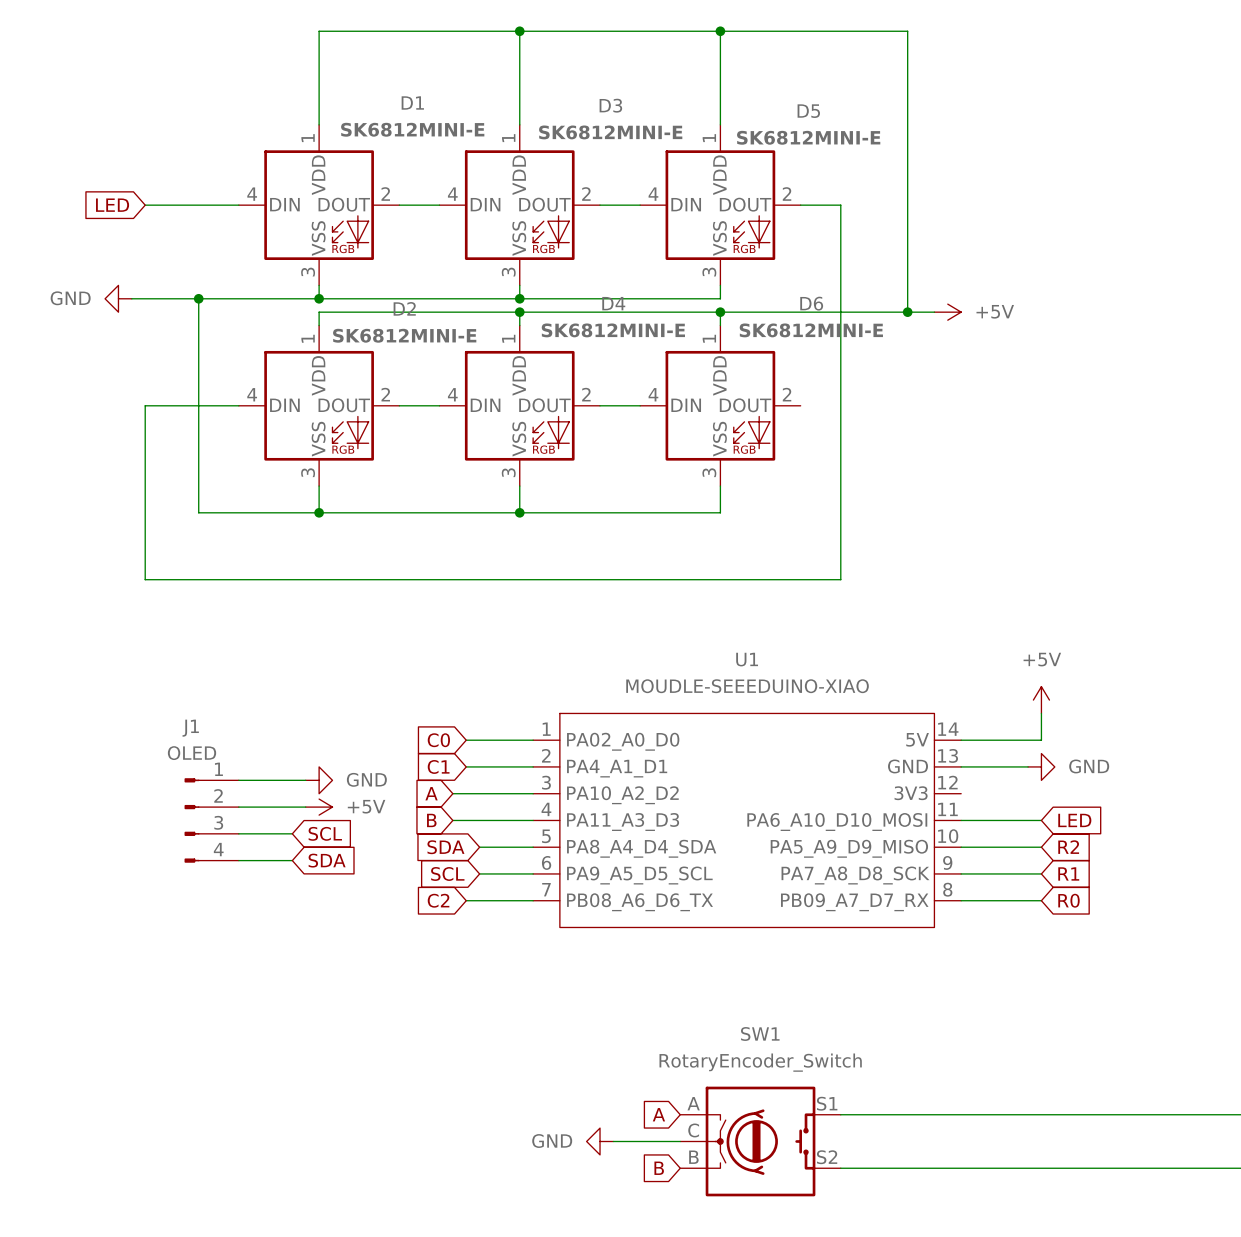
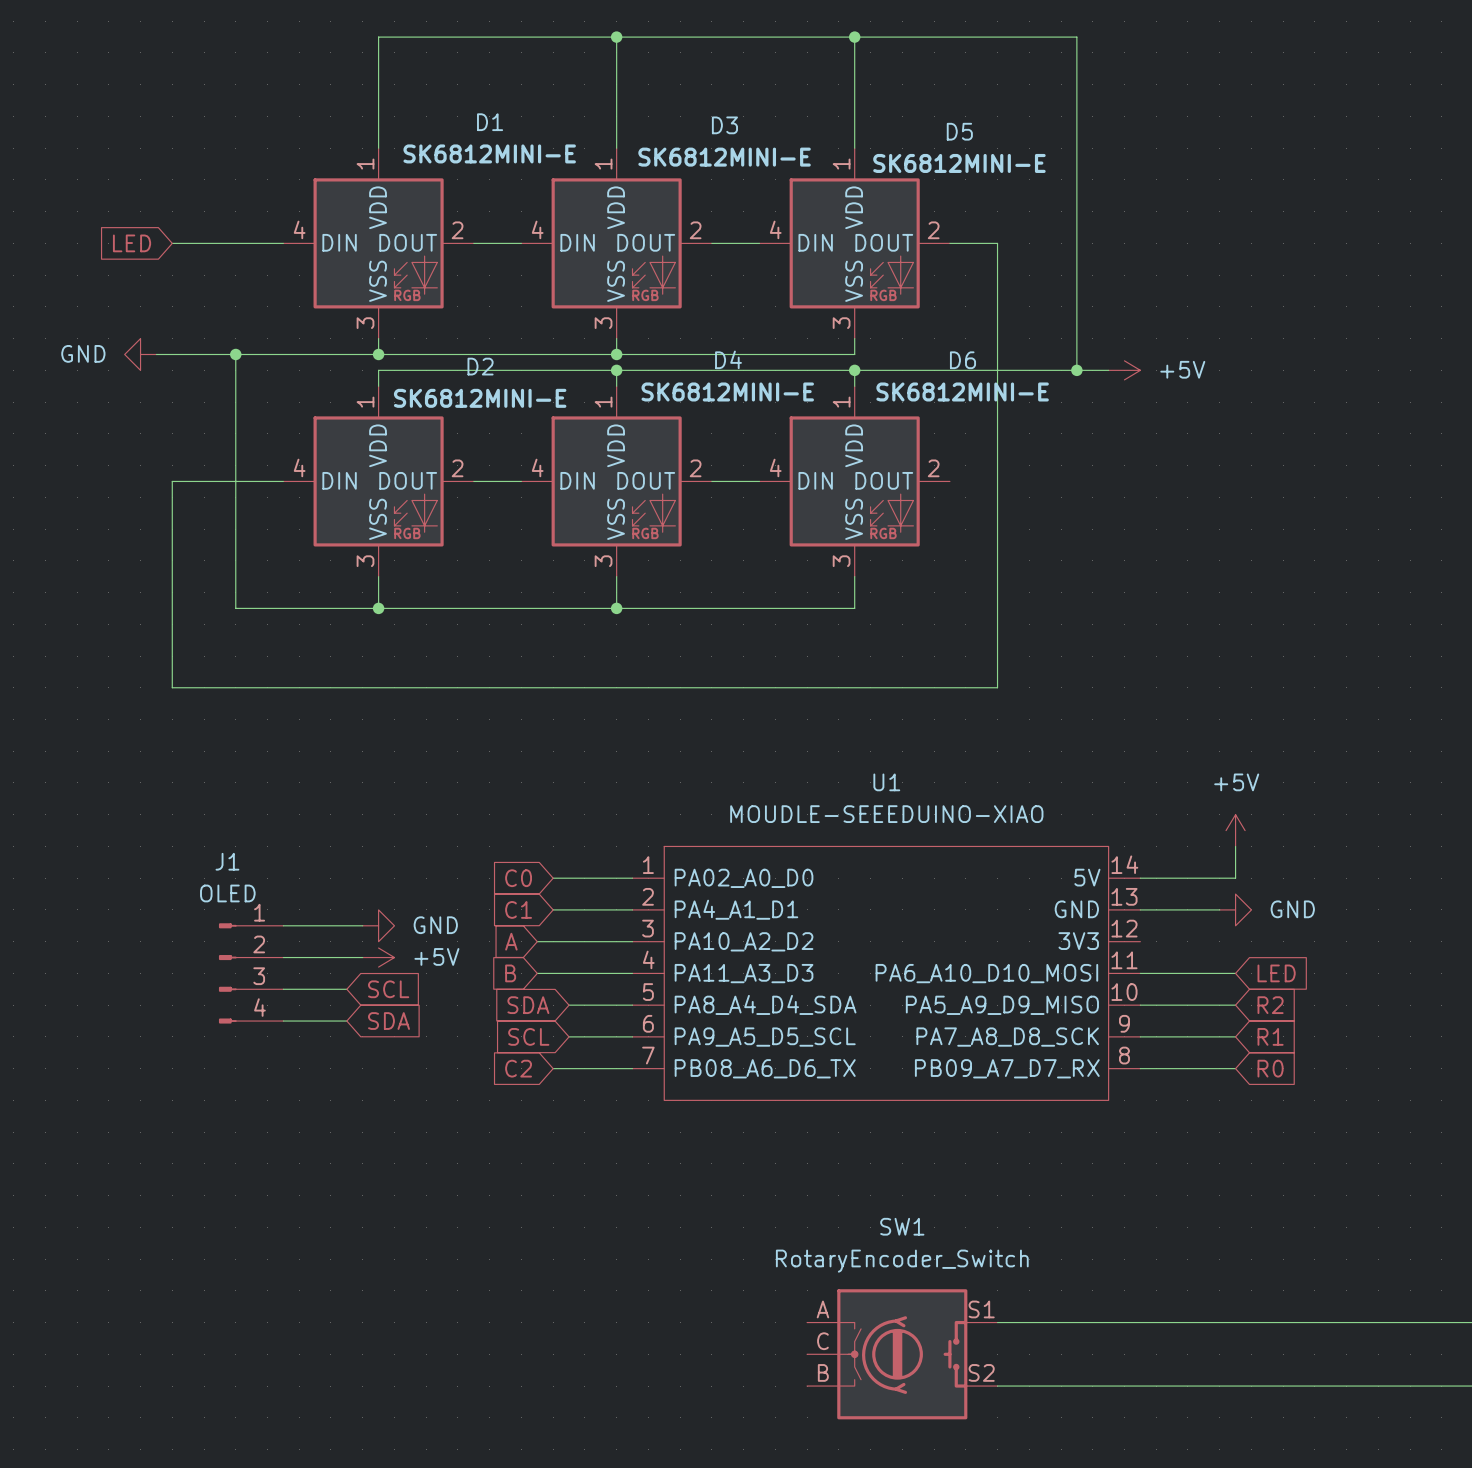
global label: A (658, 1114) -> none
power symbol: GND (600, 1141) -> none
wire: (613, 1141) (680, 1141) -> none
global label: B (659, 1168) -> none

